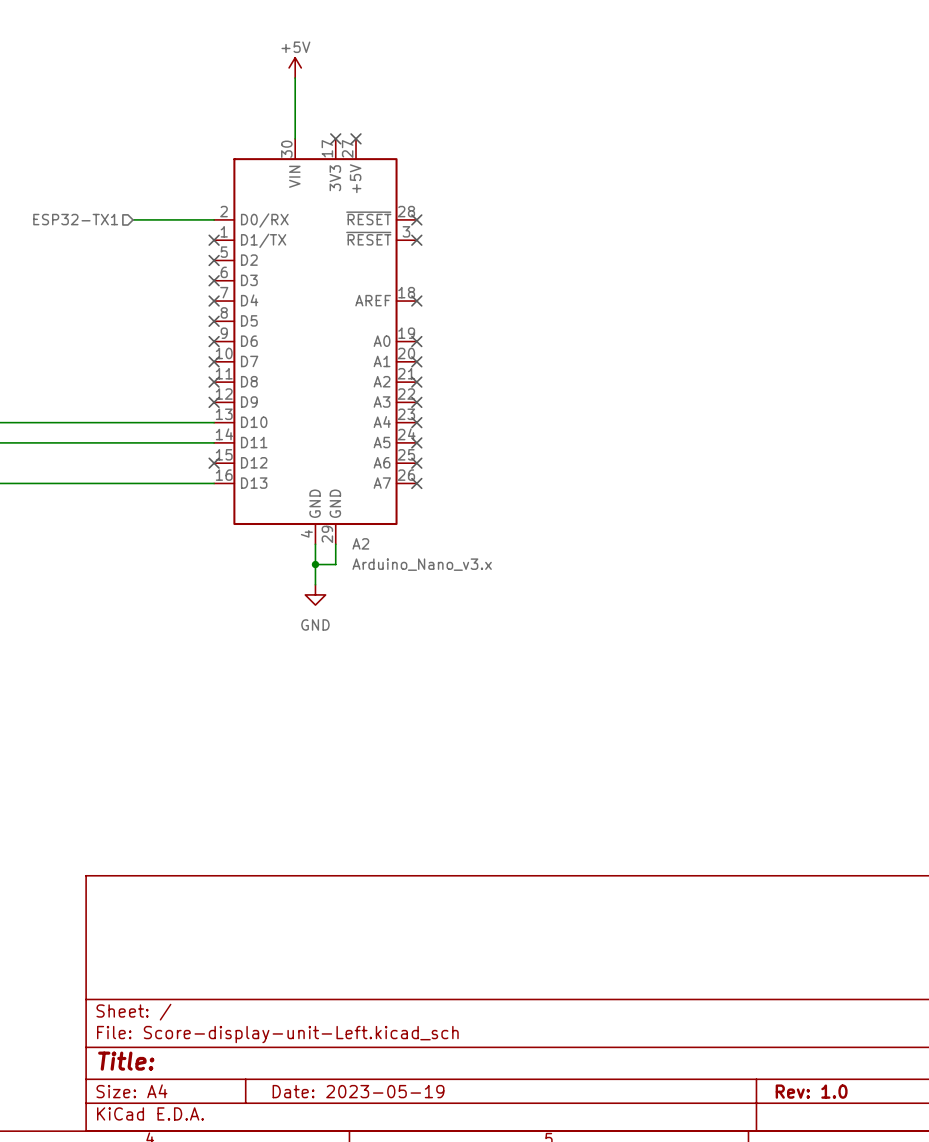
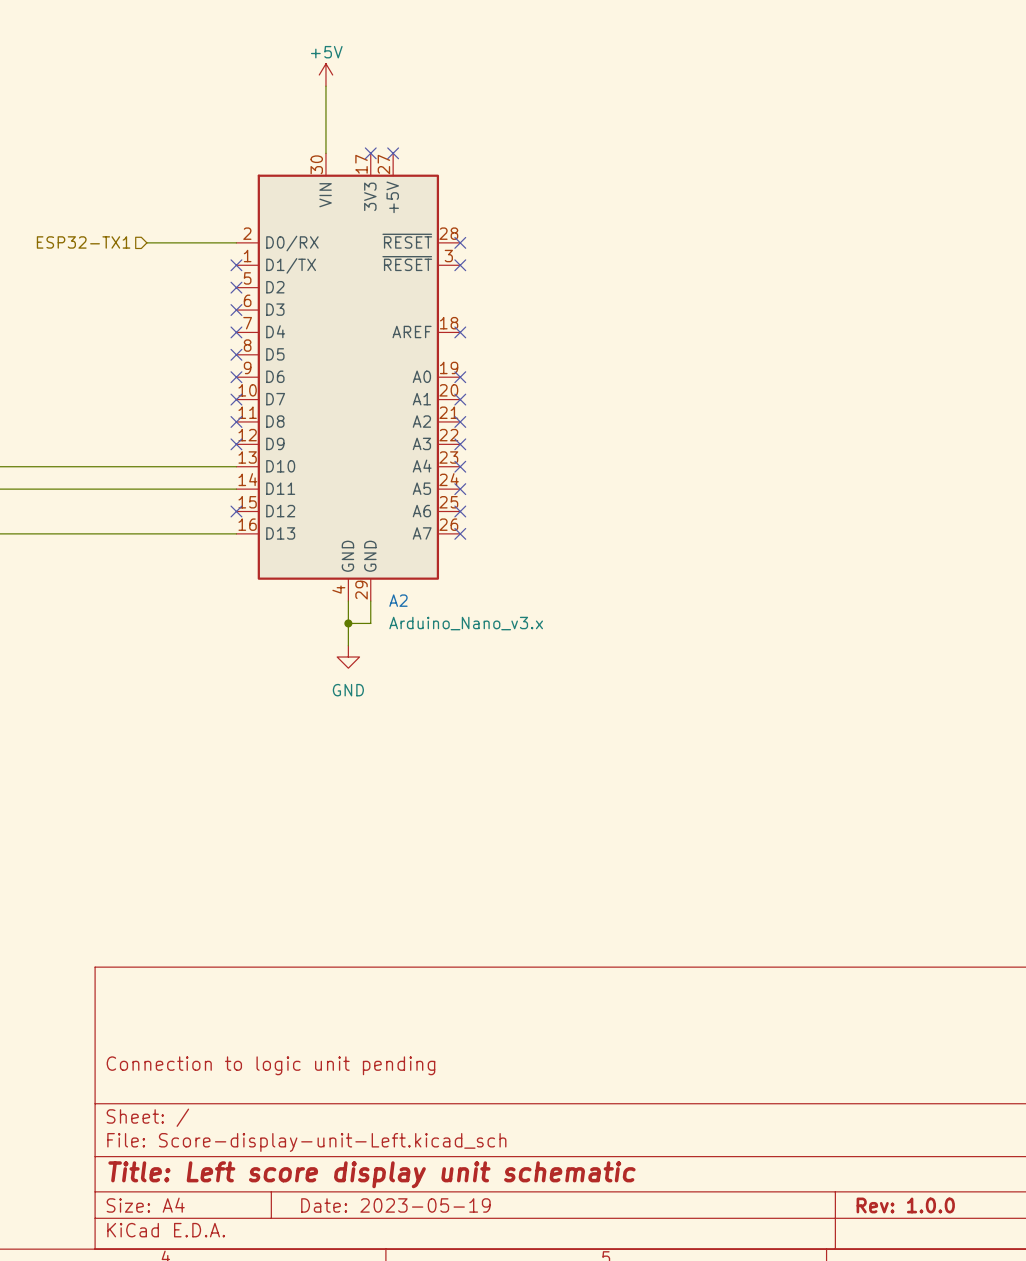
title block: none -> Connection to logic unit pending (270, 1065)
title block: Title: (126, 1061) -> Title: Left score display unit schematic (371, 1174)
title block: Rev: 1.0 (811, 1091) -> Rev: 1.0.0 (905, 1205)

